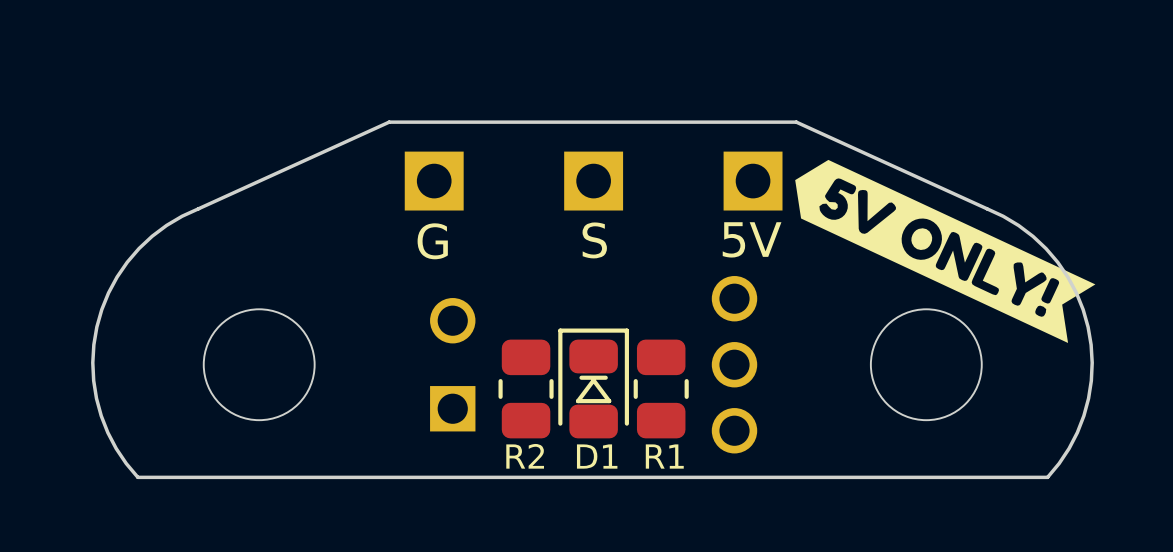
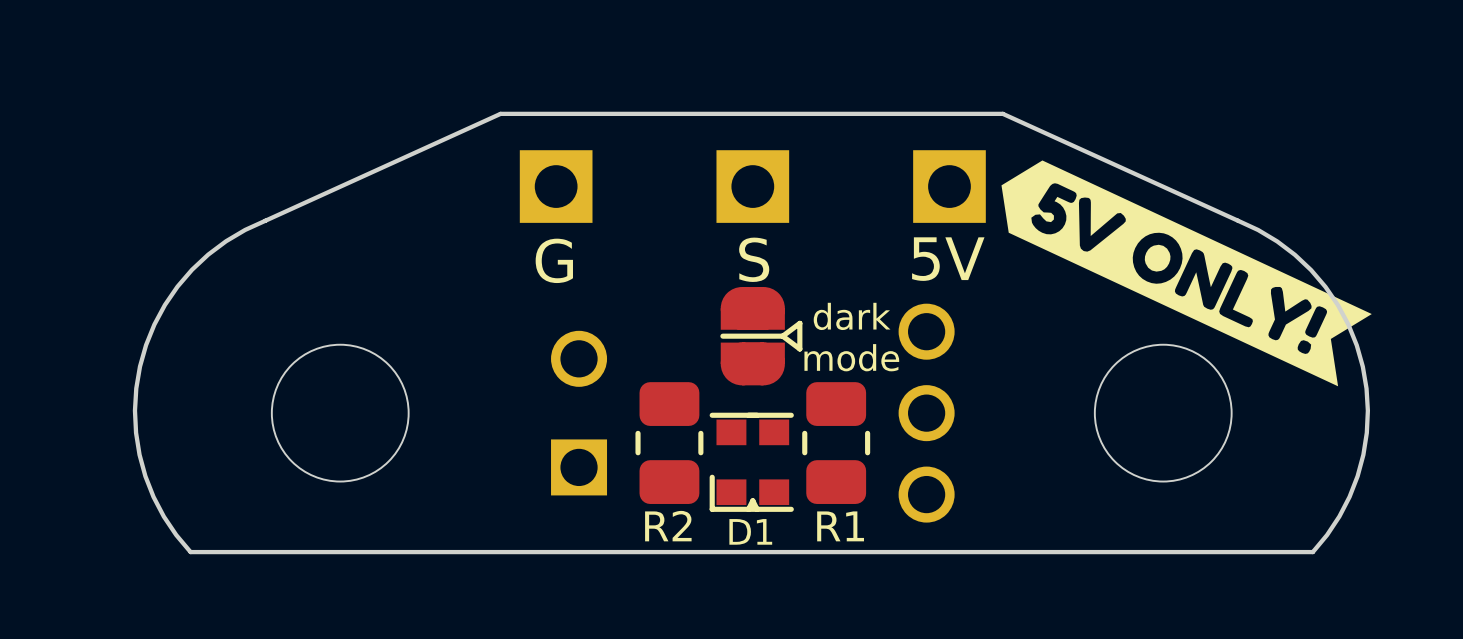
text: none -> dark (852, 316)
part: none -> (761, 336)
text: none -> mode (851, 357)
D1 footprint: [558, 328, 629, 439] -> [709, 412, 794, 512]

